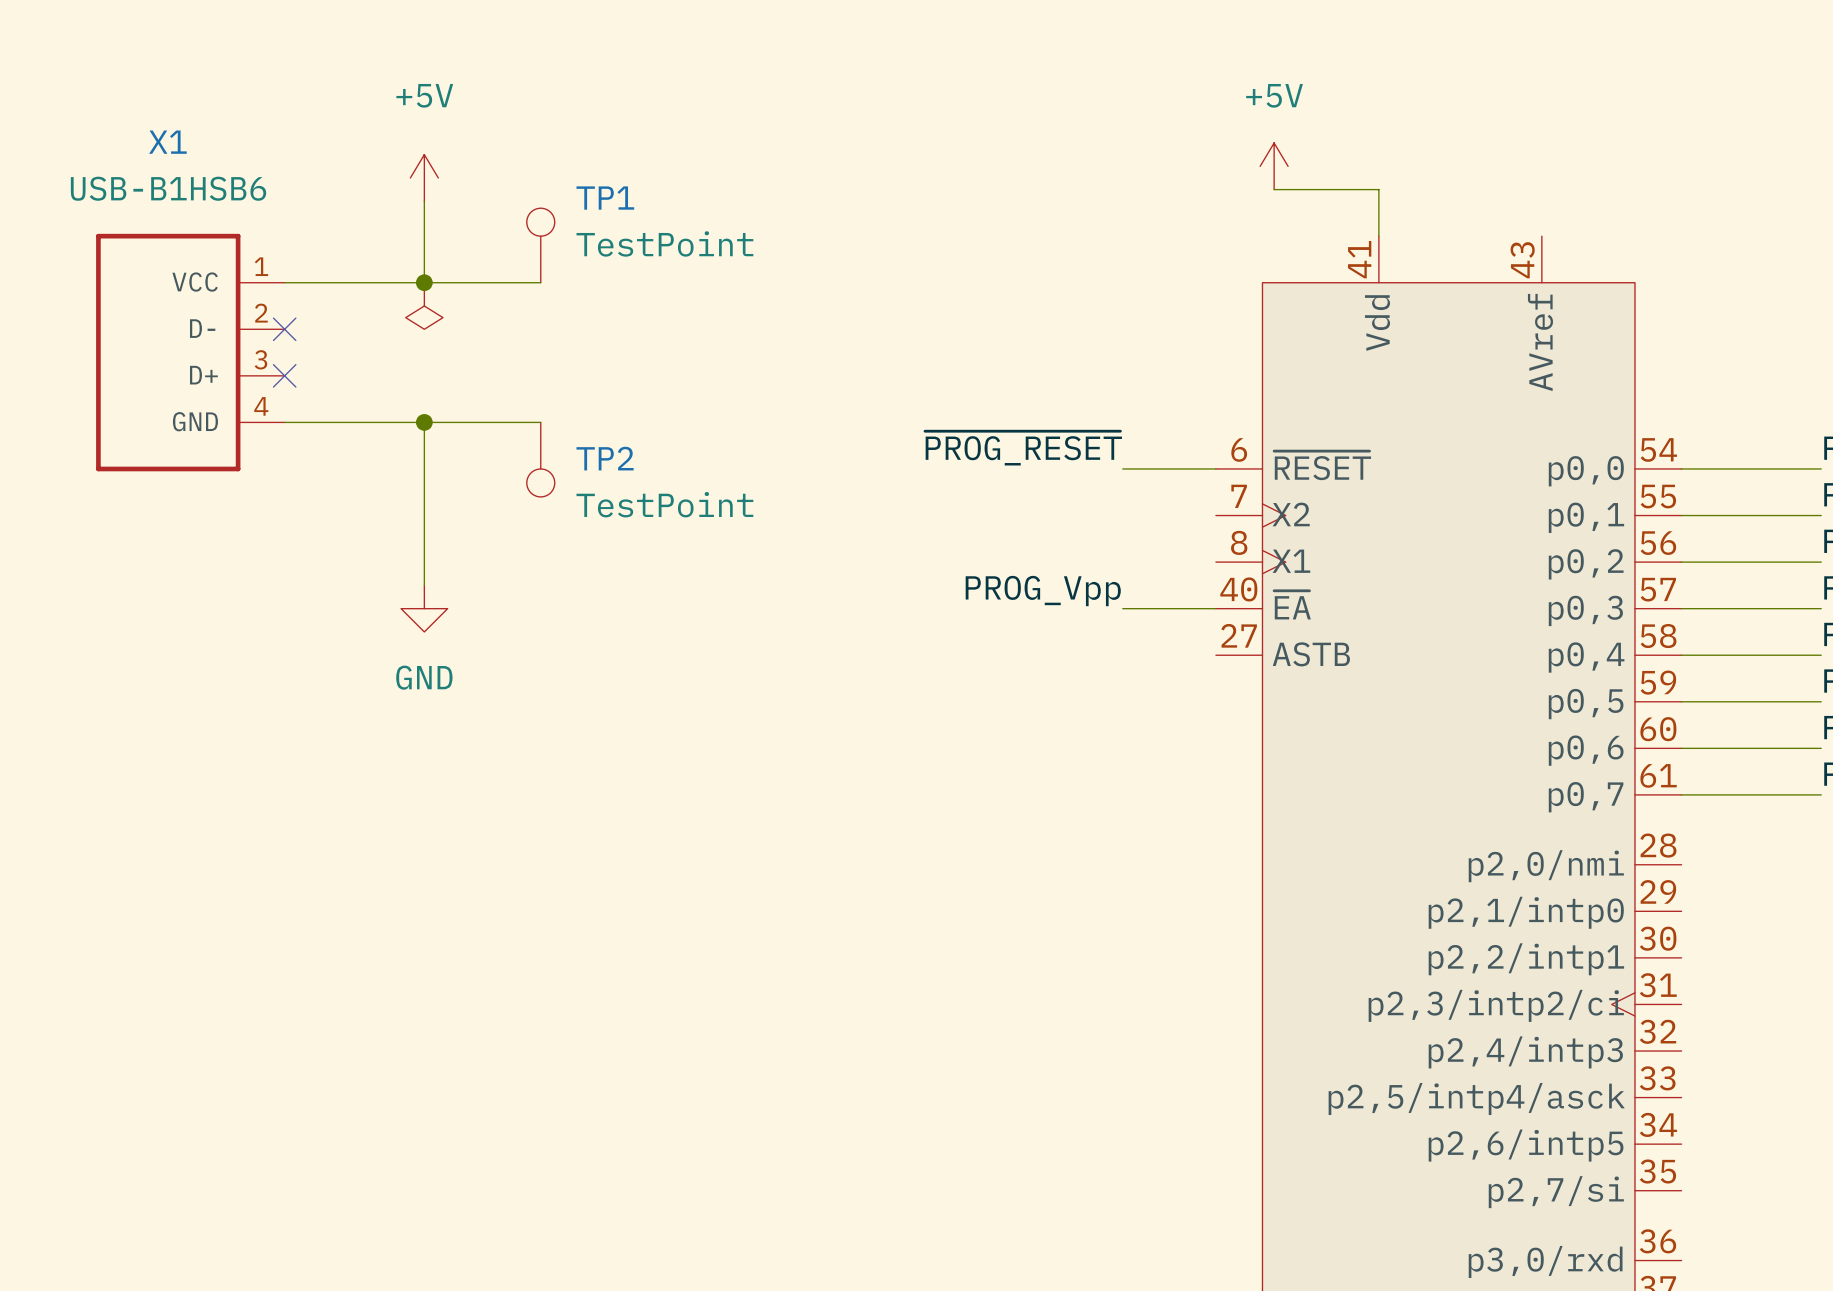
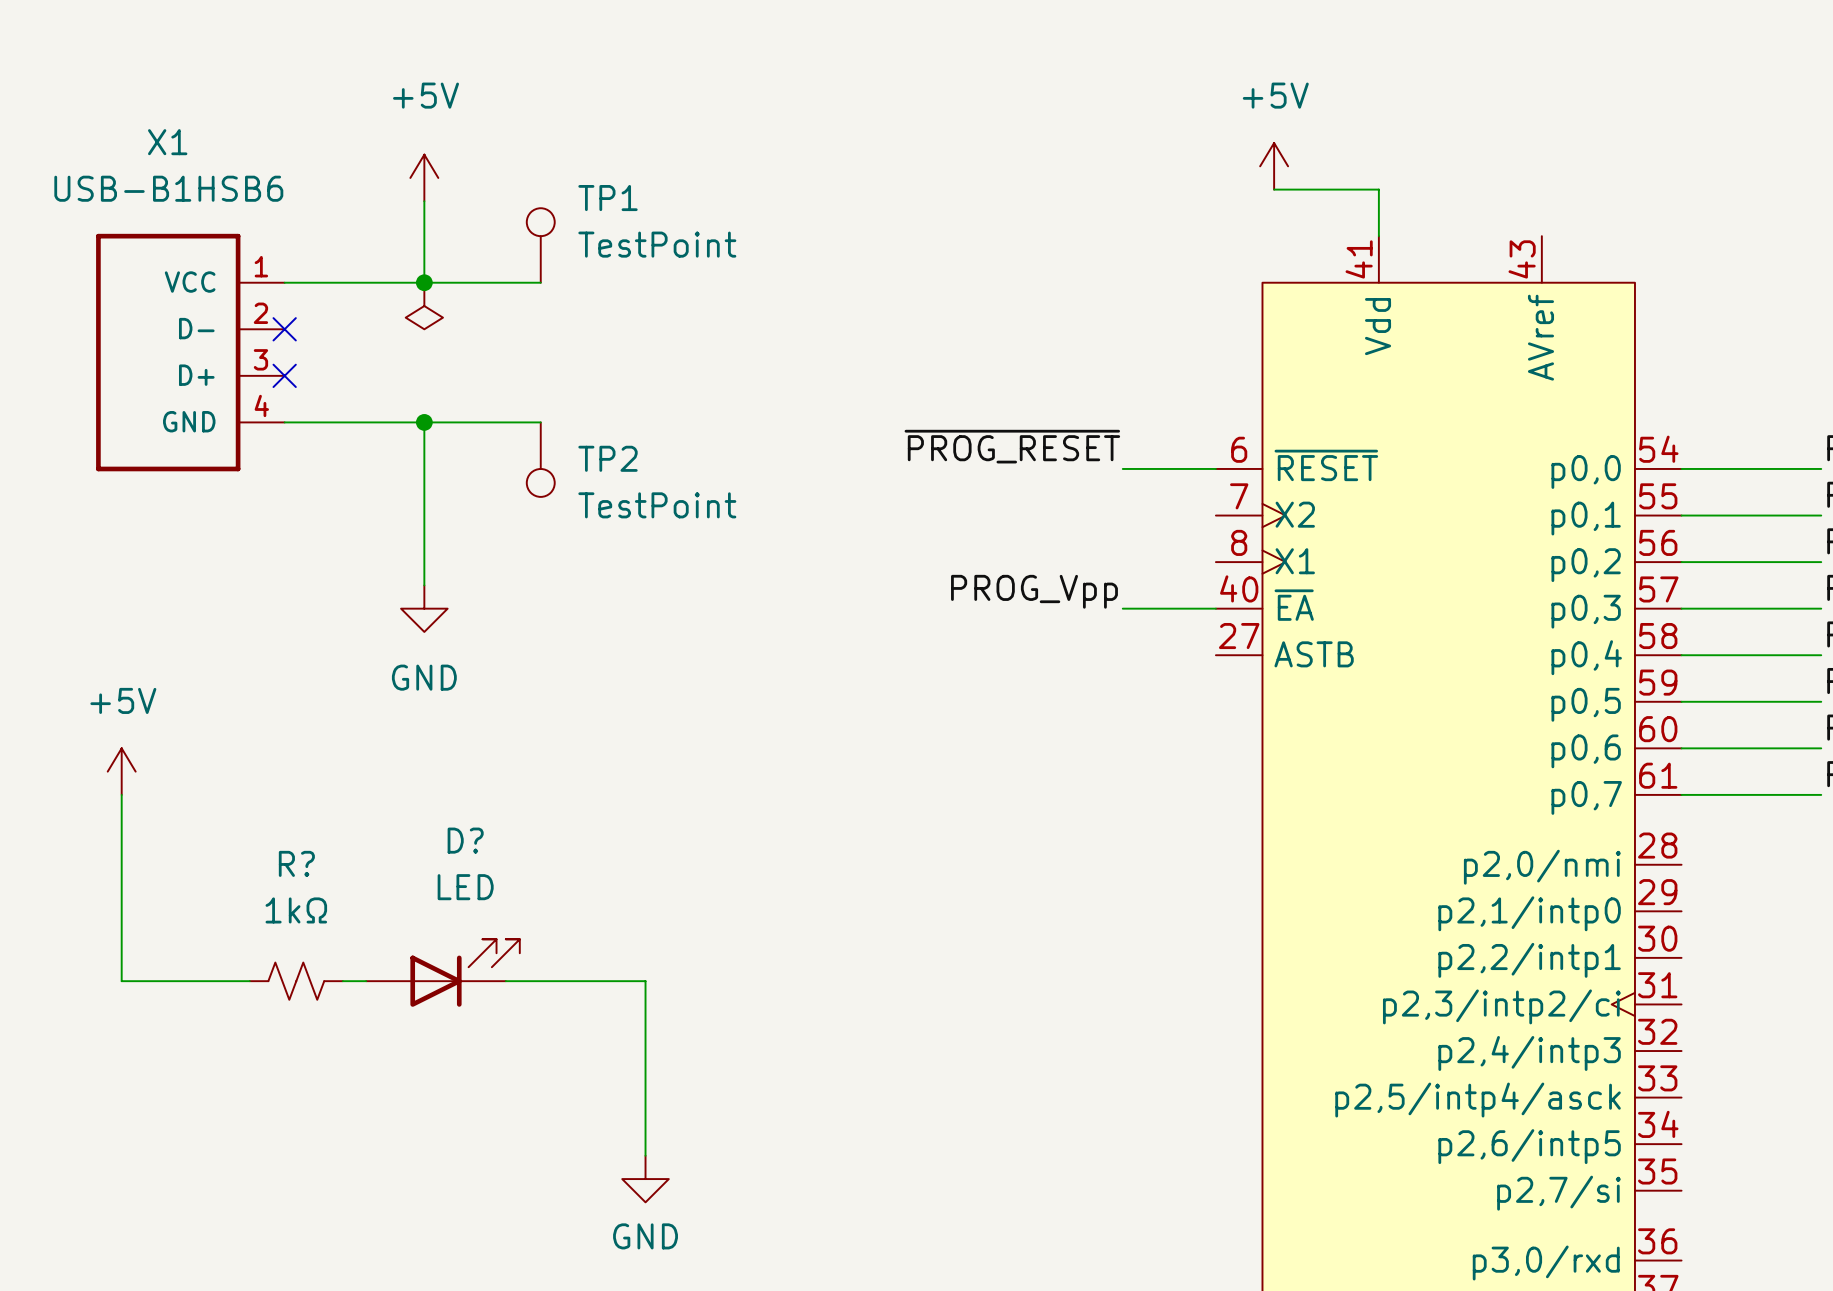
power symbol: none -> +5V (121, 771)
wire: none -> (121, 794) (121, 981) (249, 981)
D?: none -> LED (442, 973)
R?: none -> 1kΩ (296, 981)
wire: none -> (342, 981) (366, 981)
wire: none -> (505, 981) (645, 981) (645, 1155)
power symbol: none -> GND (645, 1179)

